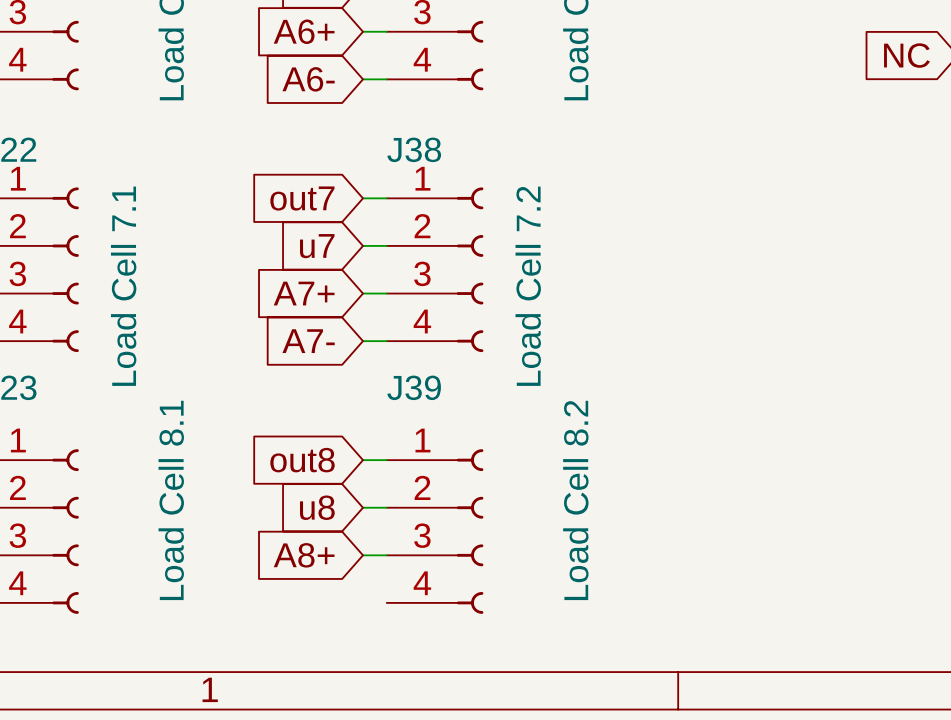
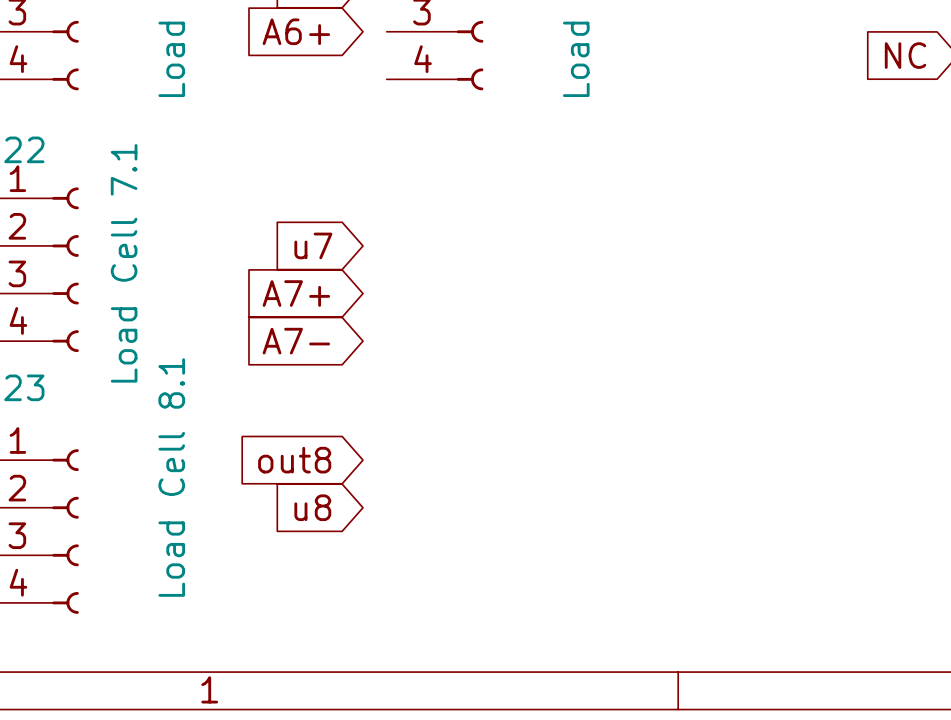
wire: (362, 31) (386, 31) -> none
global label: A6- (308, 79) -> none
wire: (362, 79) (386, 79) -> none
global label: out7 (302, 198) -> none
wire: (362, 198) (386, 198) -> none
wire: (362, 245) (386, 245) -> none
J38: Load Cell 7.2 (435, 269) -> none
wire: (362, 293) (386, 293) -> none
wire: (362, 341) (386, 341) -> none
wire: (362, 460) (386, 460) -> none
wire: (362, 507) (386, 507) -> none
J39: Load Cell 8.2 (435, 531) -> none
global label: A8+ (304, 555) -> none
wire: (362, 555) (386, 555) -> none

